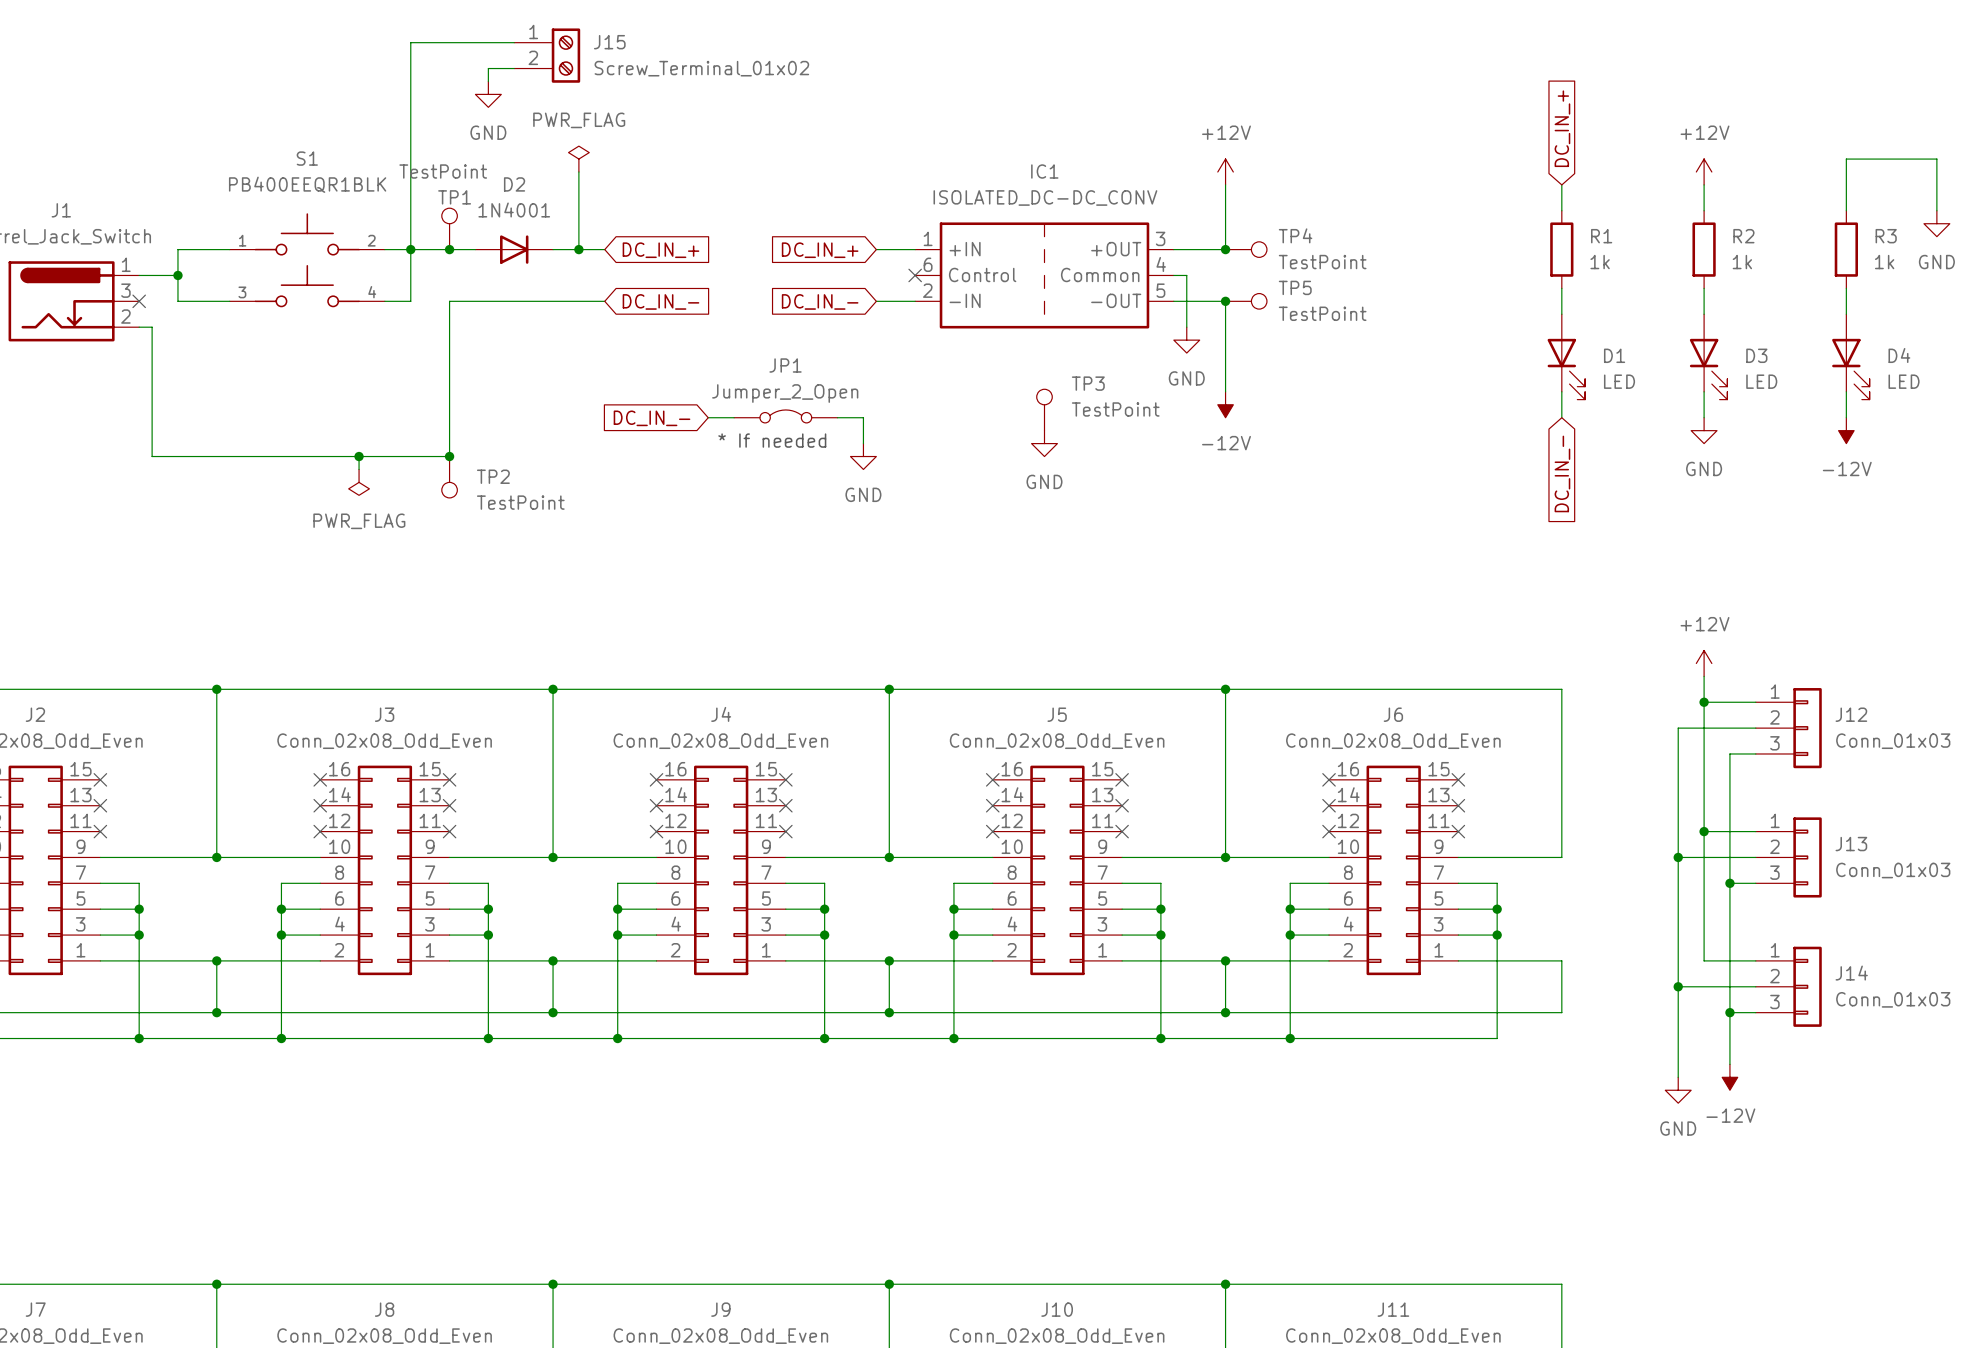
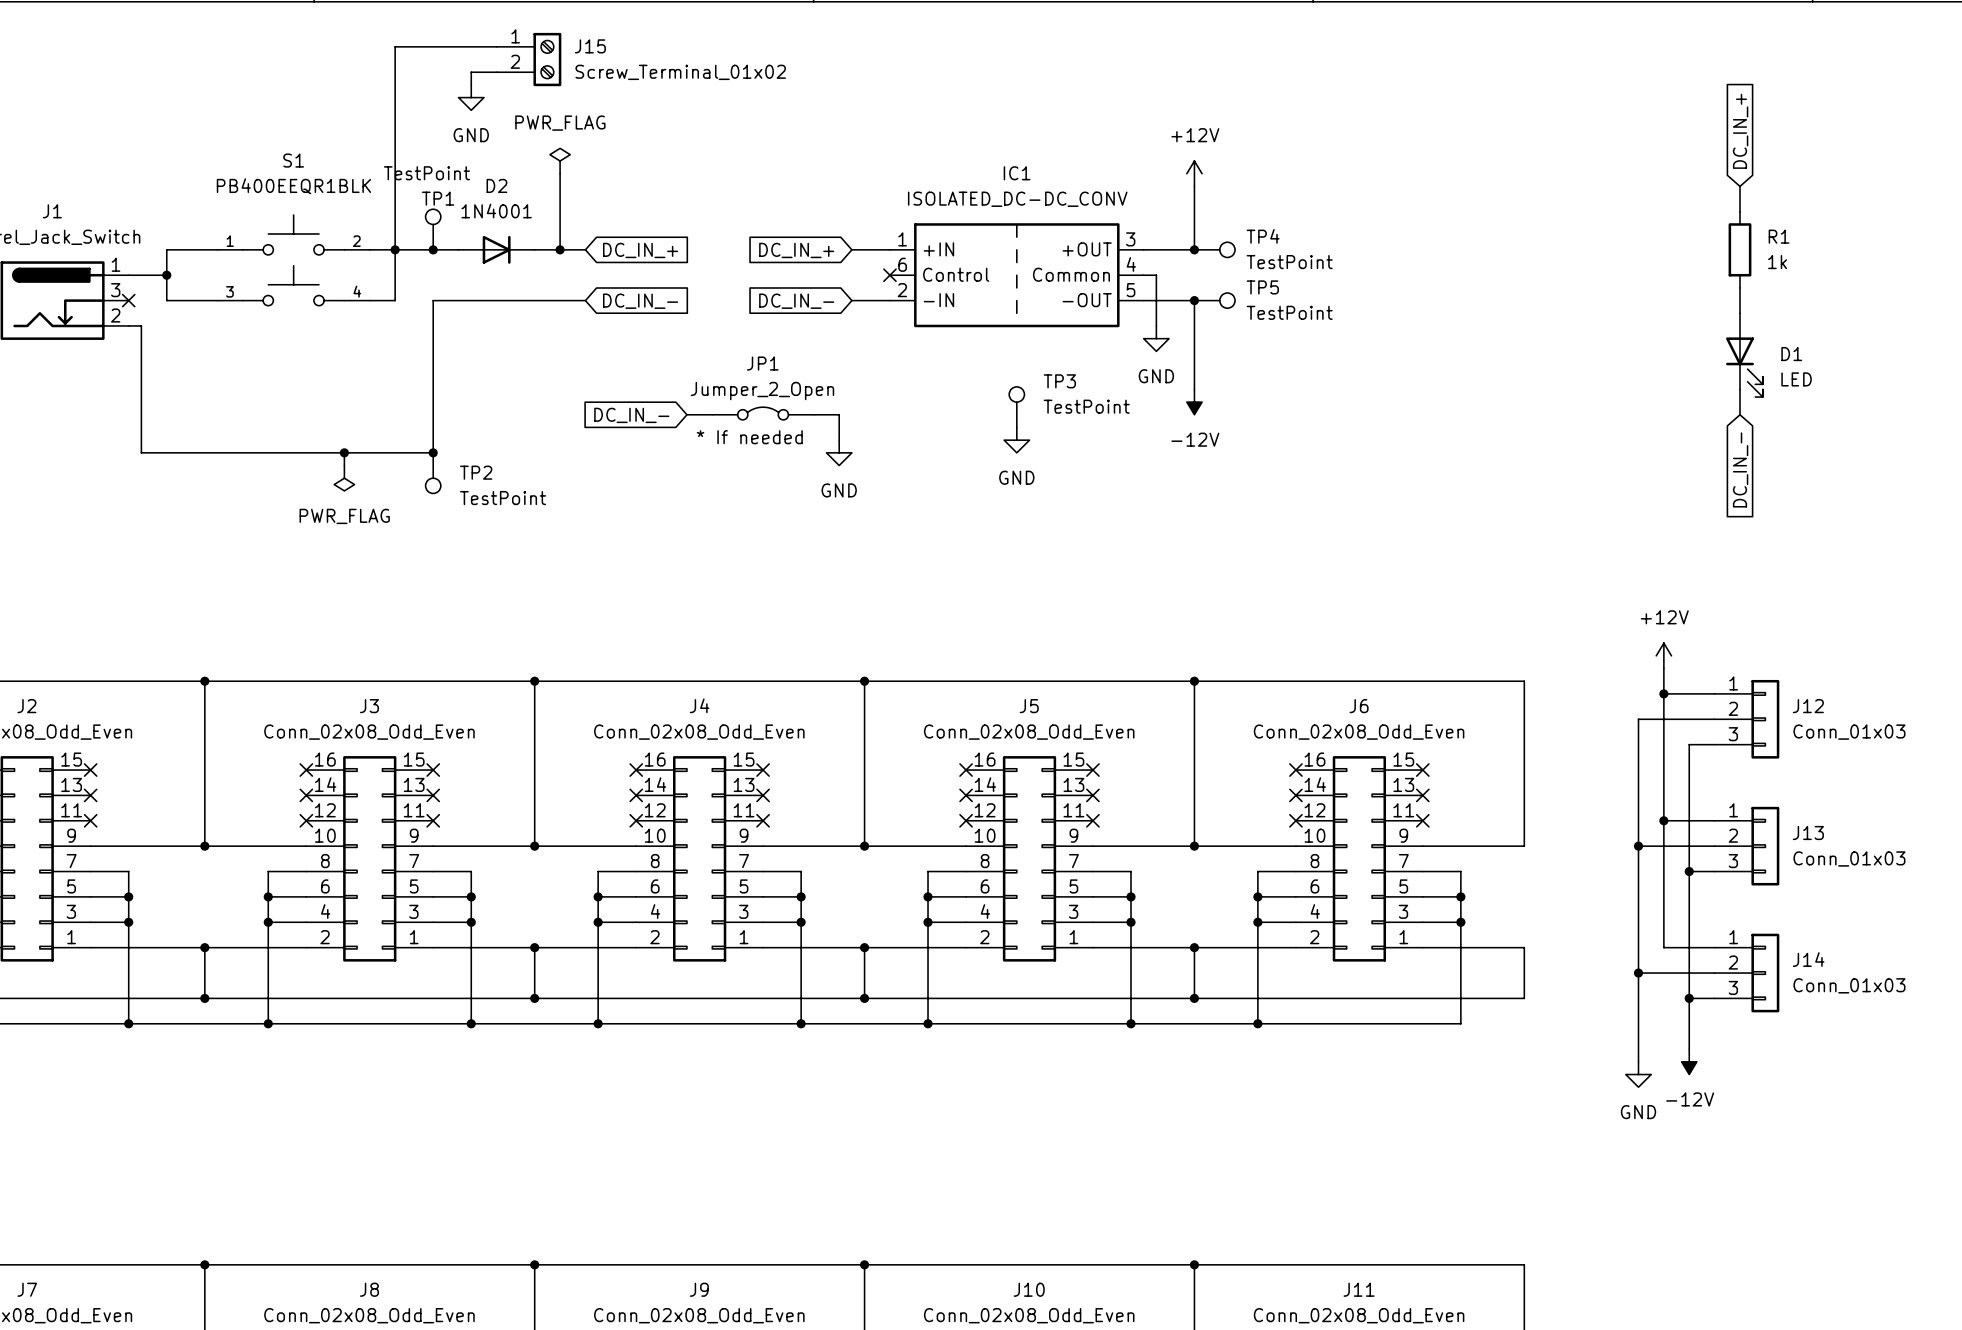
global label position: DC_IN_+ (1562, 128) -> DC_IN_+ (1740, 131)
power symbol: +12V (1704, 171) -> none
wire: (1561, 184) (1561, 210) -> none
wire: (1704, 184) (1704, 210) -> (1739, 186) (1739, 211)
wire: (1846, 210) (1846, 159) (1936, 159) (1936, 210) -> none
power symbol: GND (1936, 223) -> none
R1 position: (1561, 249) -> (1739, 249)
R2: 1k (1704, 249) -> none
R3: 1k (1846, 249) -> none
wire: (1561, 288) (1561, 314) -> none
wire: (1704, 288) (1704, 314) -> (1739, 287) (1739, 313)
wire: (1846, 288) (1846, 314) -> none
D1 position: (1566, 356) -> (1744, 355)
D3: LED (1708, 356) -> none
D4: LED (1850, 356) -> none
wire: (1561, 391) (1561, 417) -> none
wire: (1704, 391) (1704, 417) -> (1739, 389) (1739, 414)
wire: (1846, 391) (1846, 417) -> none
power symbol: GND (1704, 430) -> none
power symbol: -12V (1846, 430) -> none
global label position: DC_IN_- (1562, 473) -> DC_IN_- (1740, 469)

